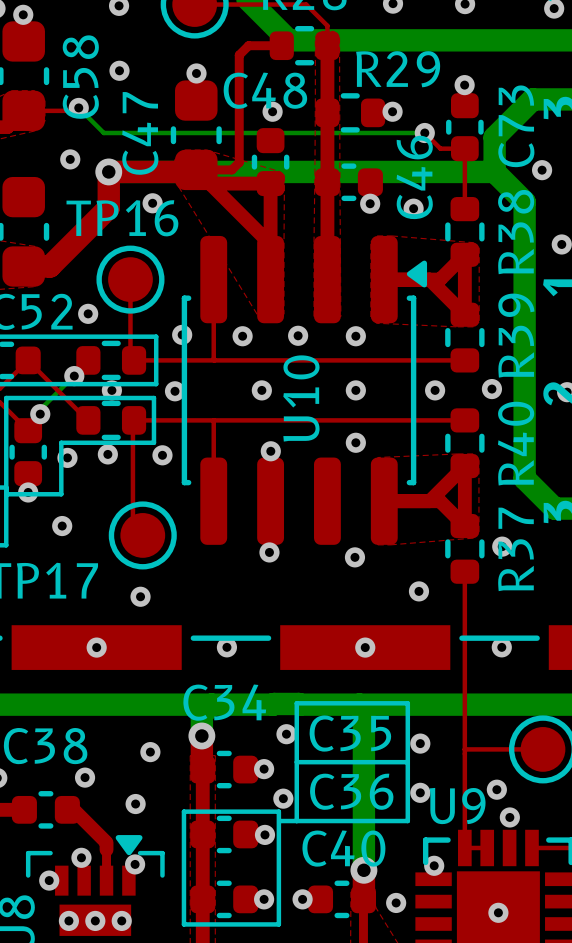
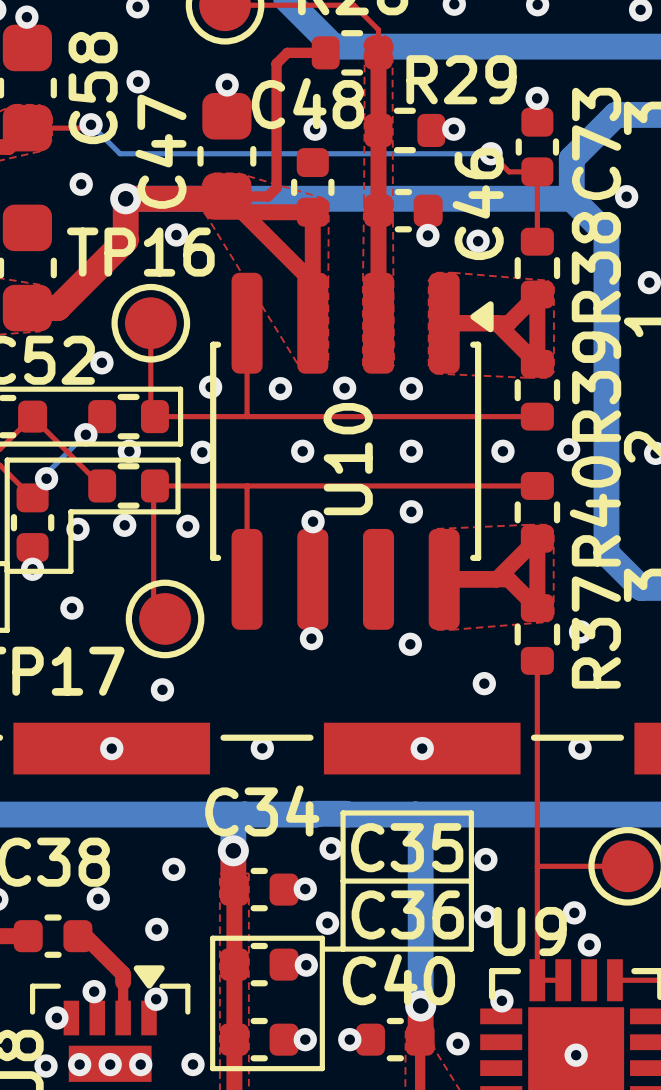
via: none -> (192, 1064)
via: none -> (46, 1066)

